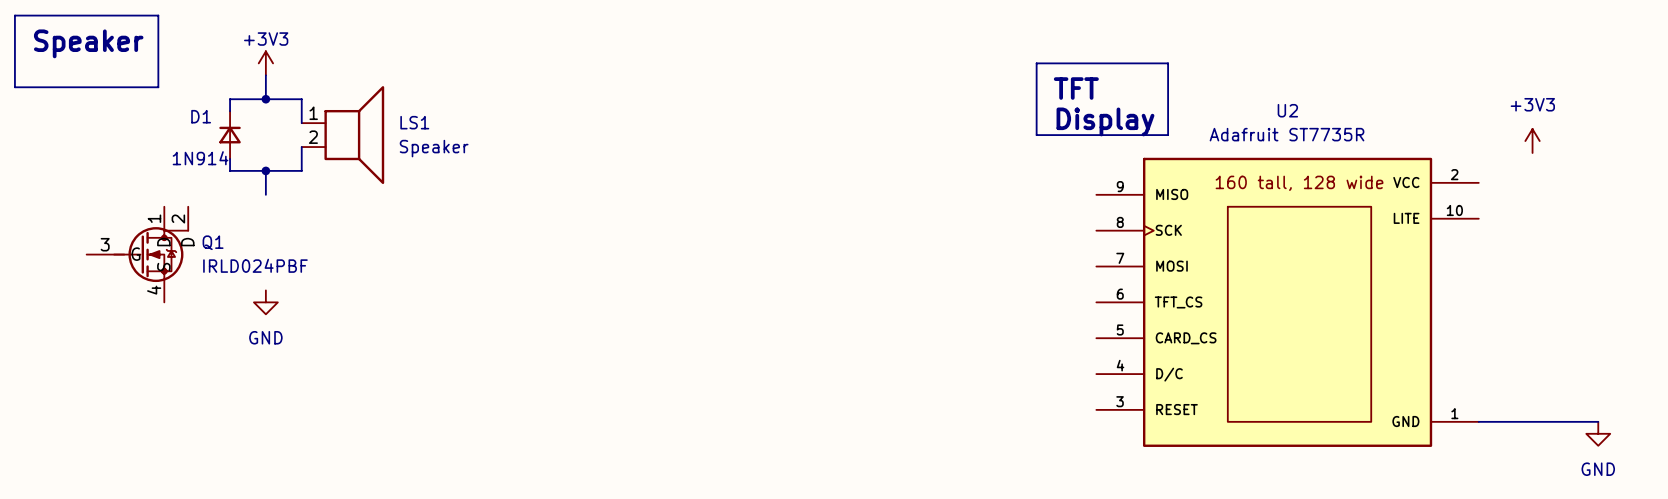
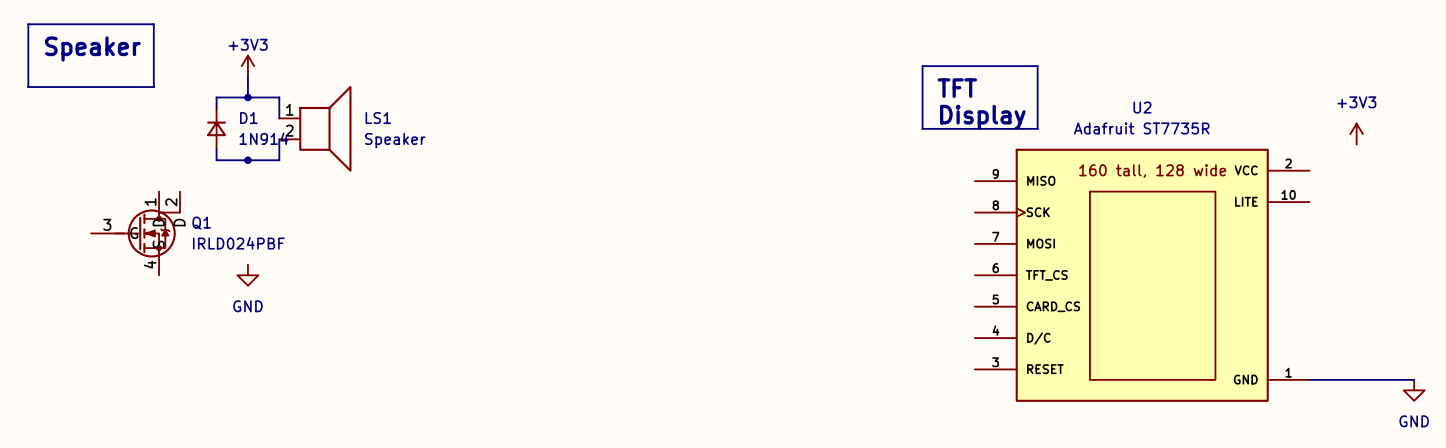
D1 name position: D1 (201, 116) -> D1 (248, 118)
D1 value position: 1N914 (200, 158) -> 1N914 (263, 138)
wire: (265, 170) (265, 194) -> none

